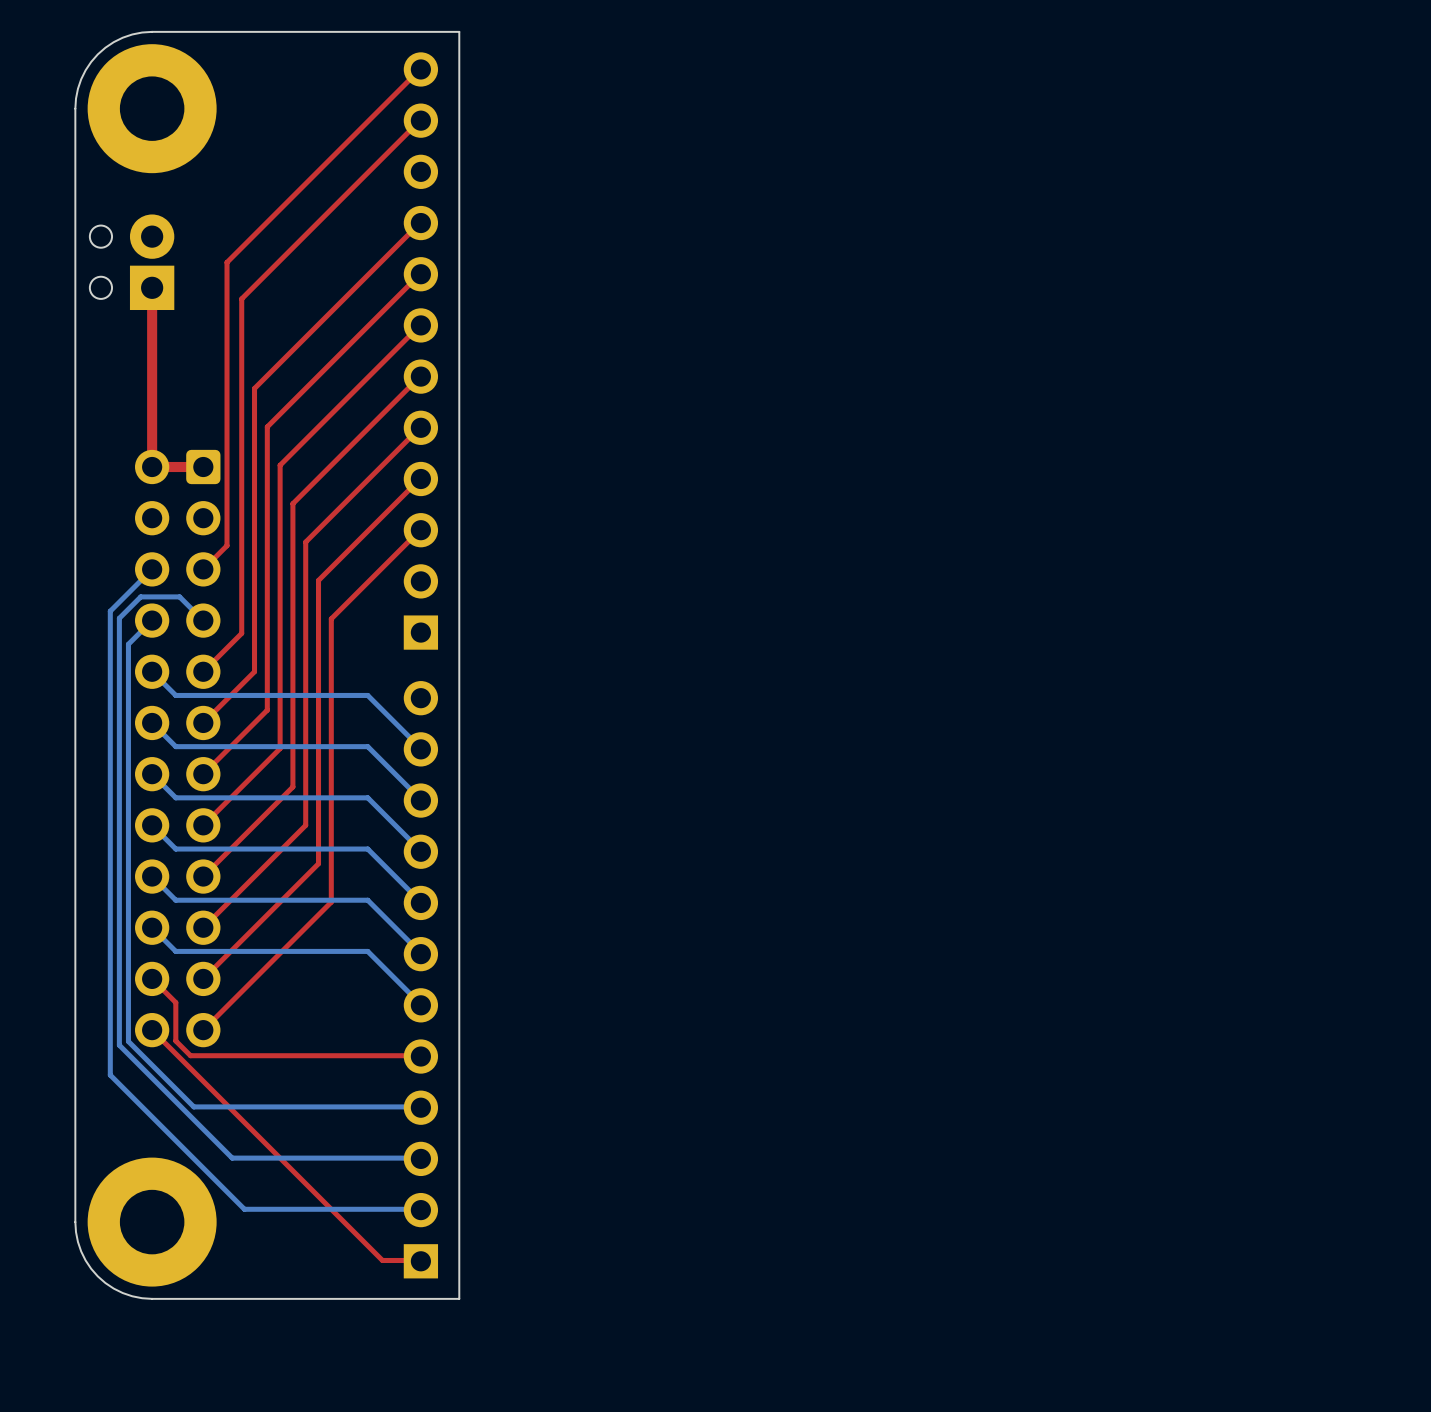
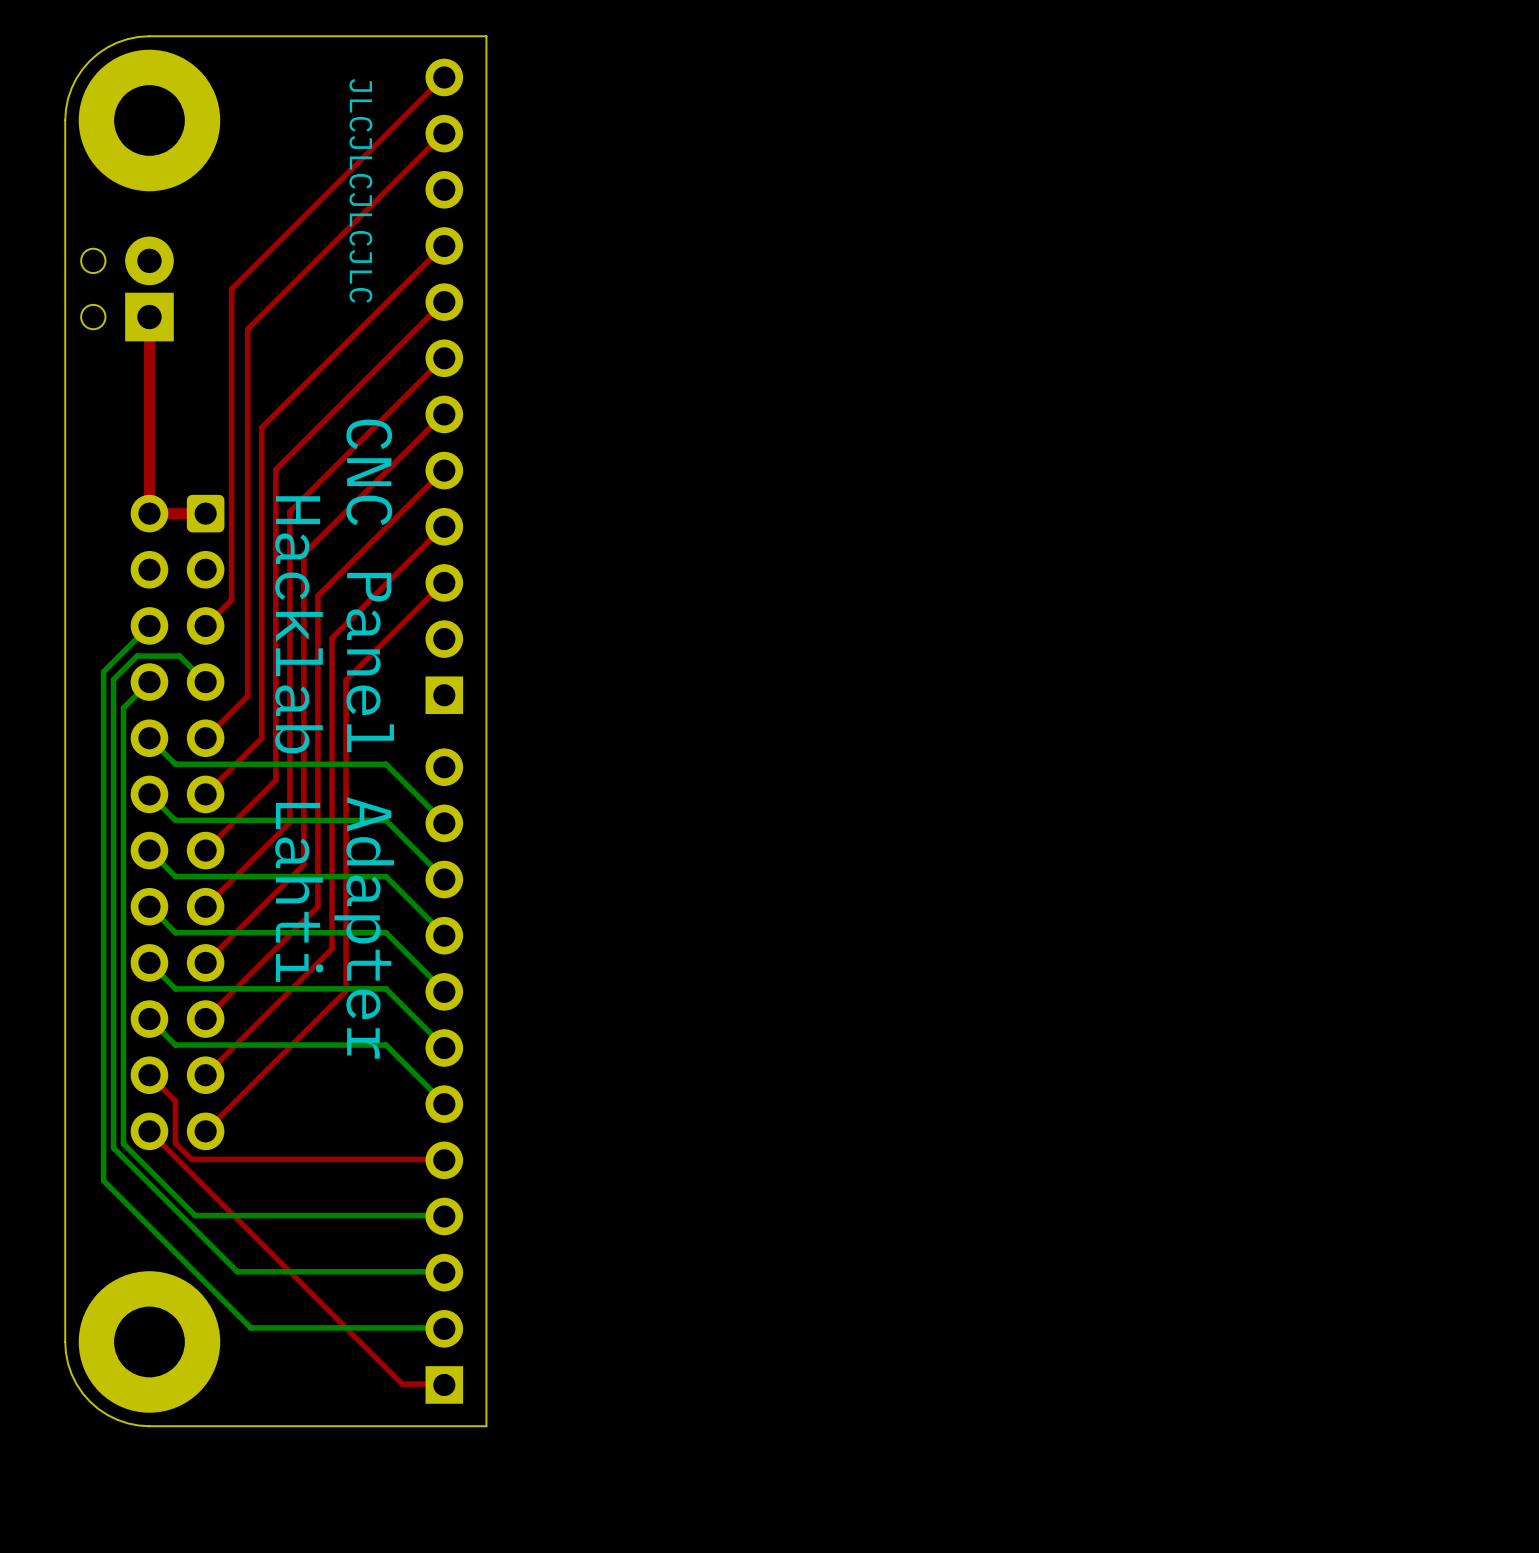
text: none -> JLCJLCJLCJLC (360, 190)
text: none -> Hacklab Lahti (299, 739)
text: none -> CNC Panel Adapter (364, 739)

